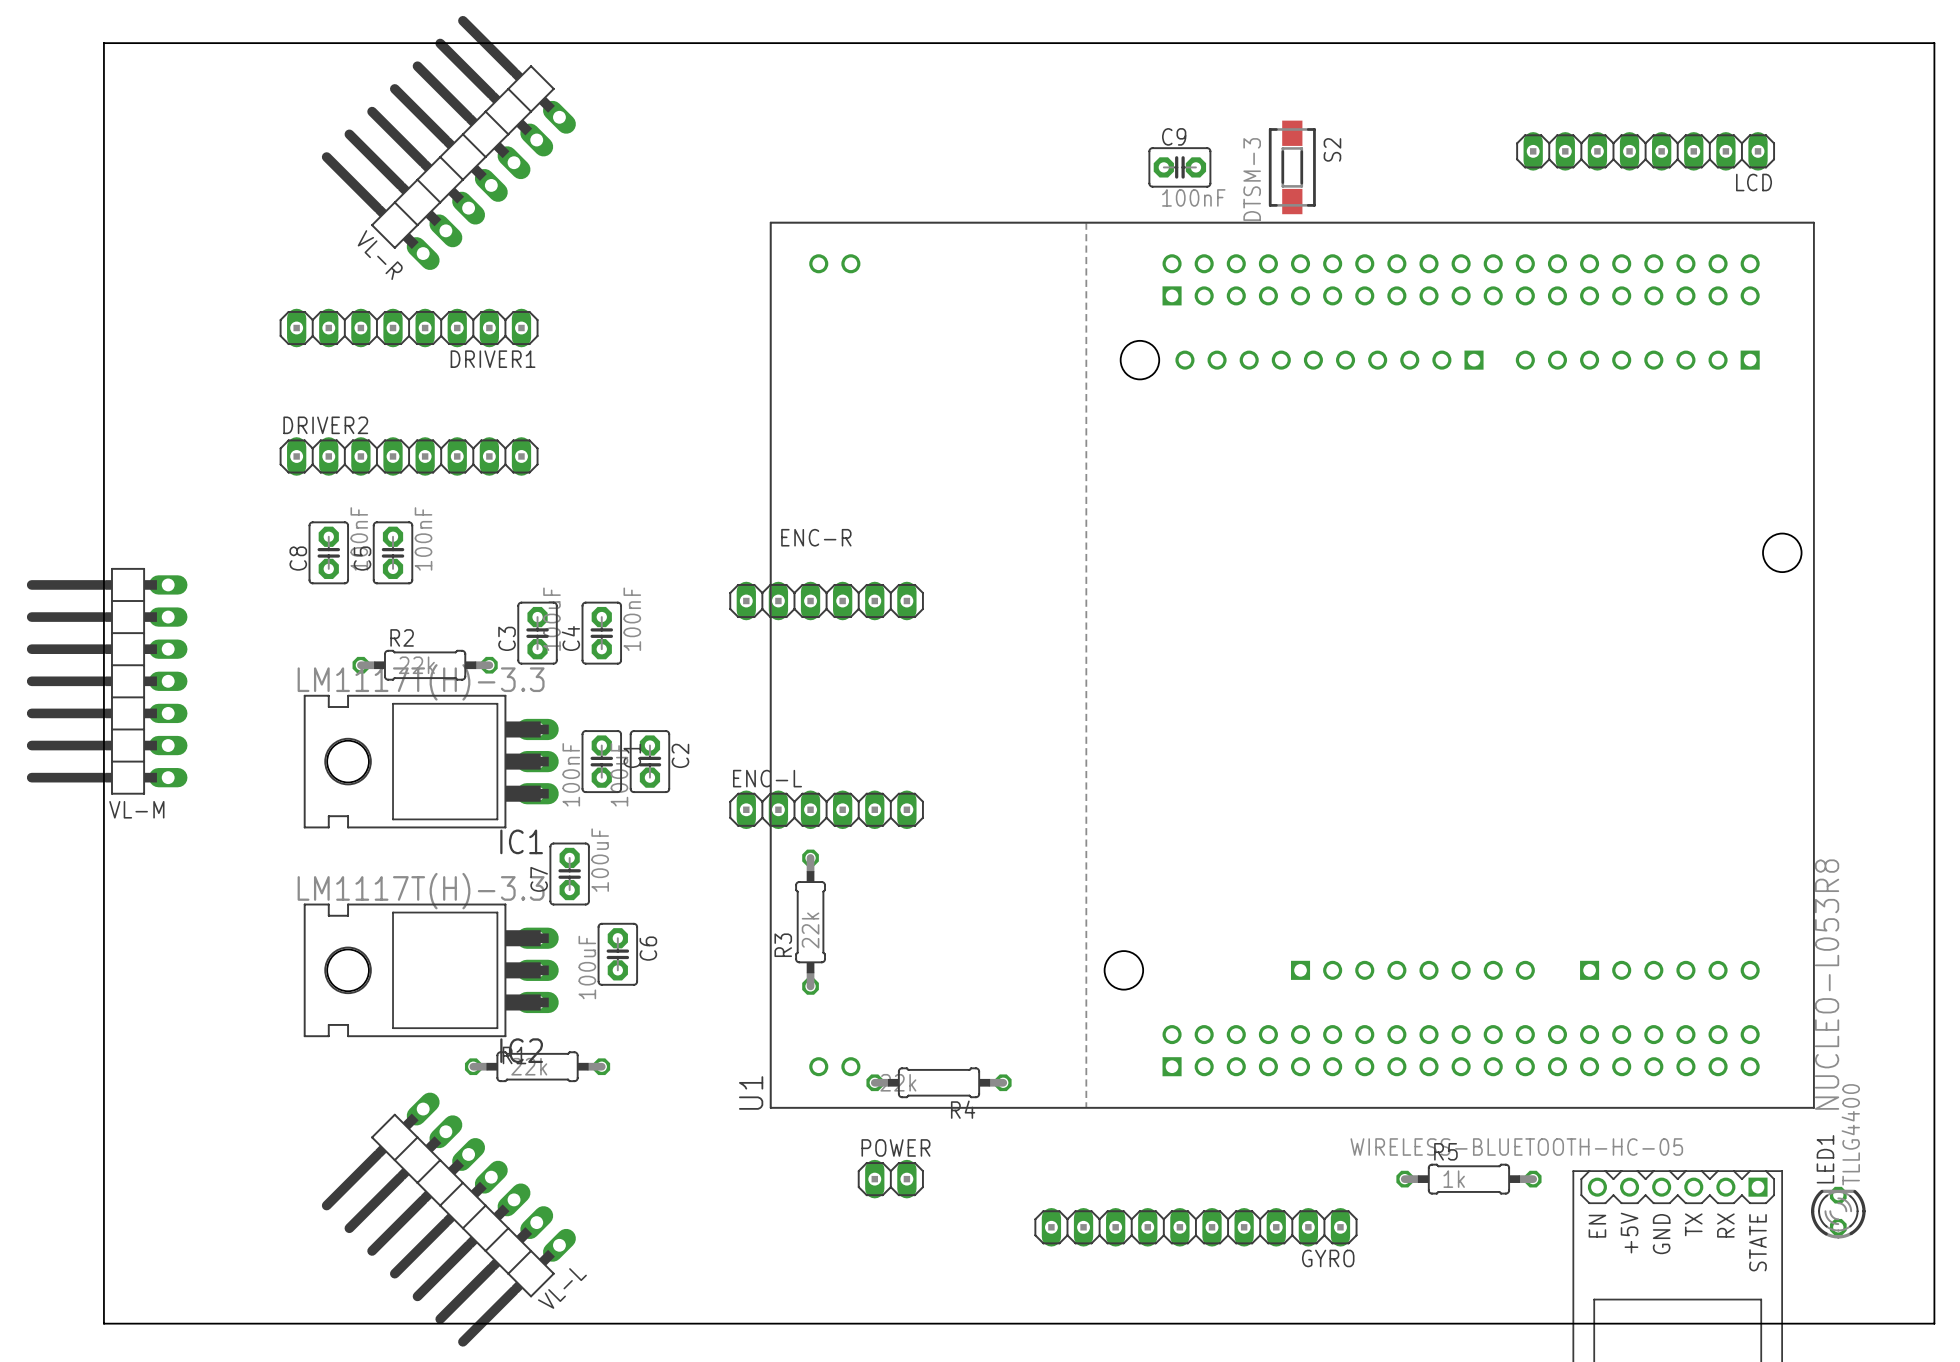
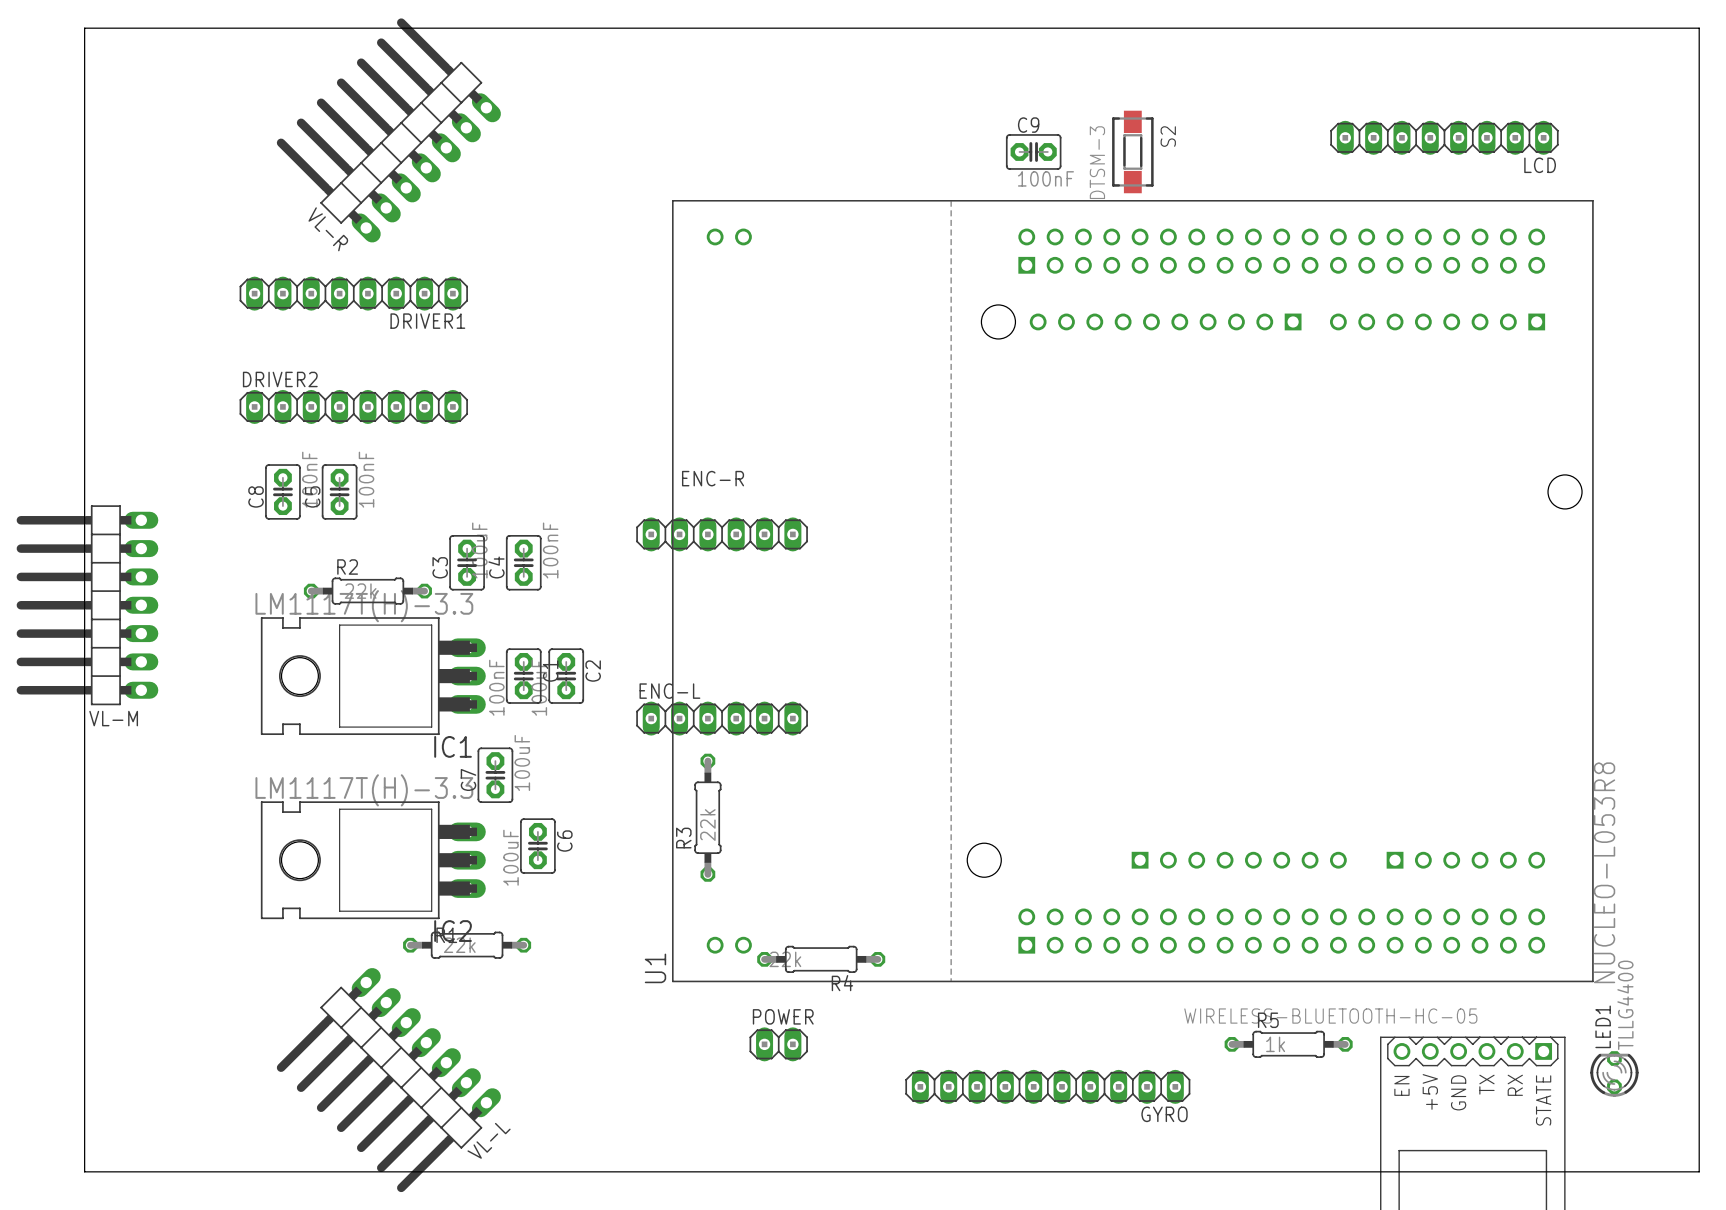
board edge: (103, 43) (1934, 43) -> (84, 42) (84, 28) (1699, 28) (1699, 42)

